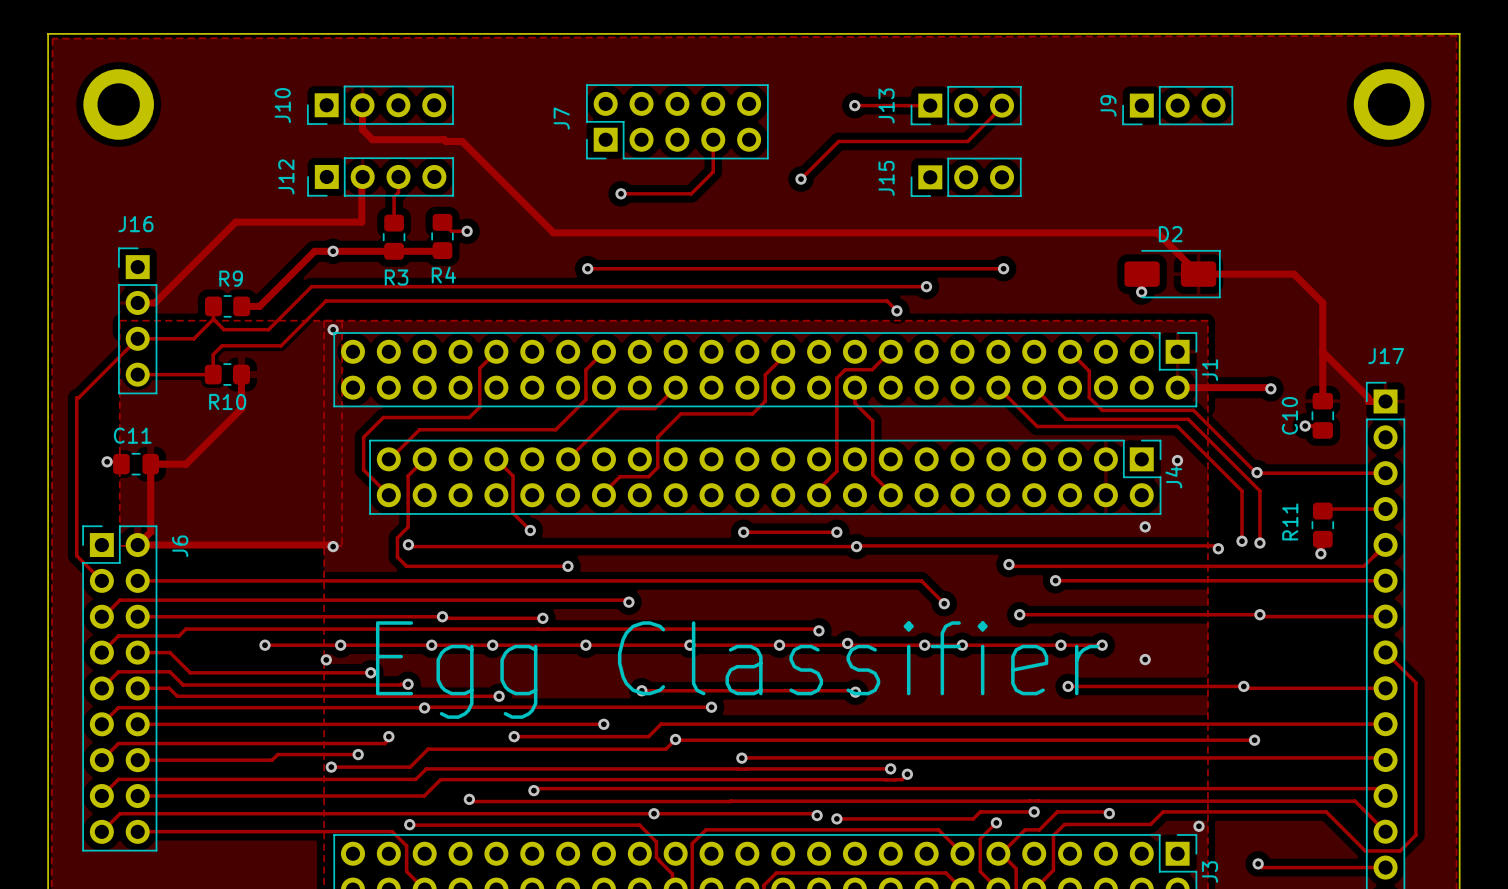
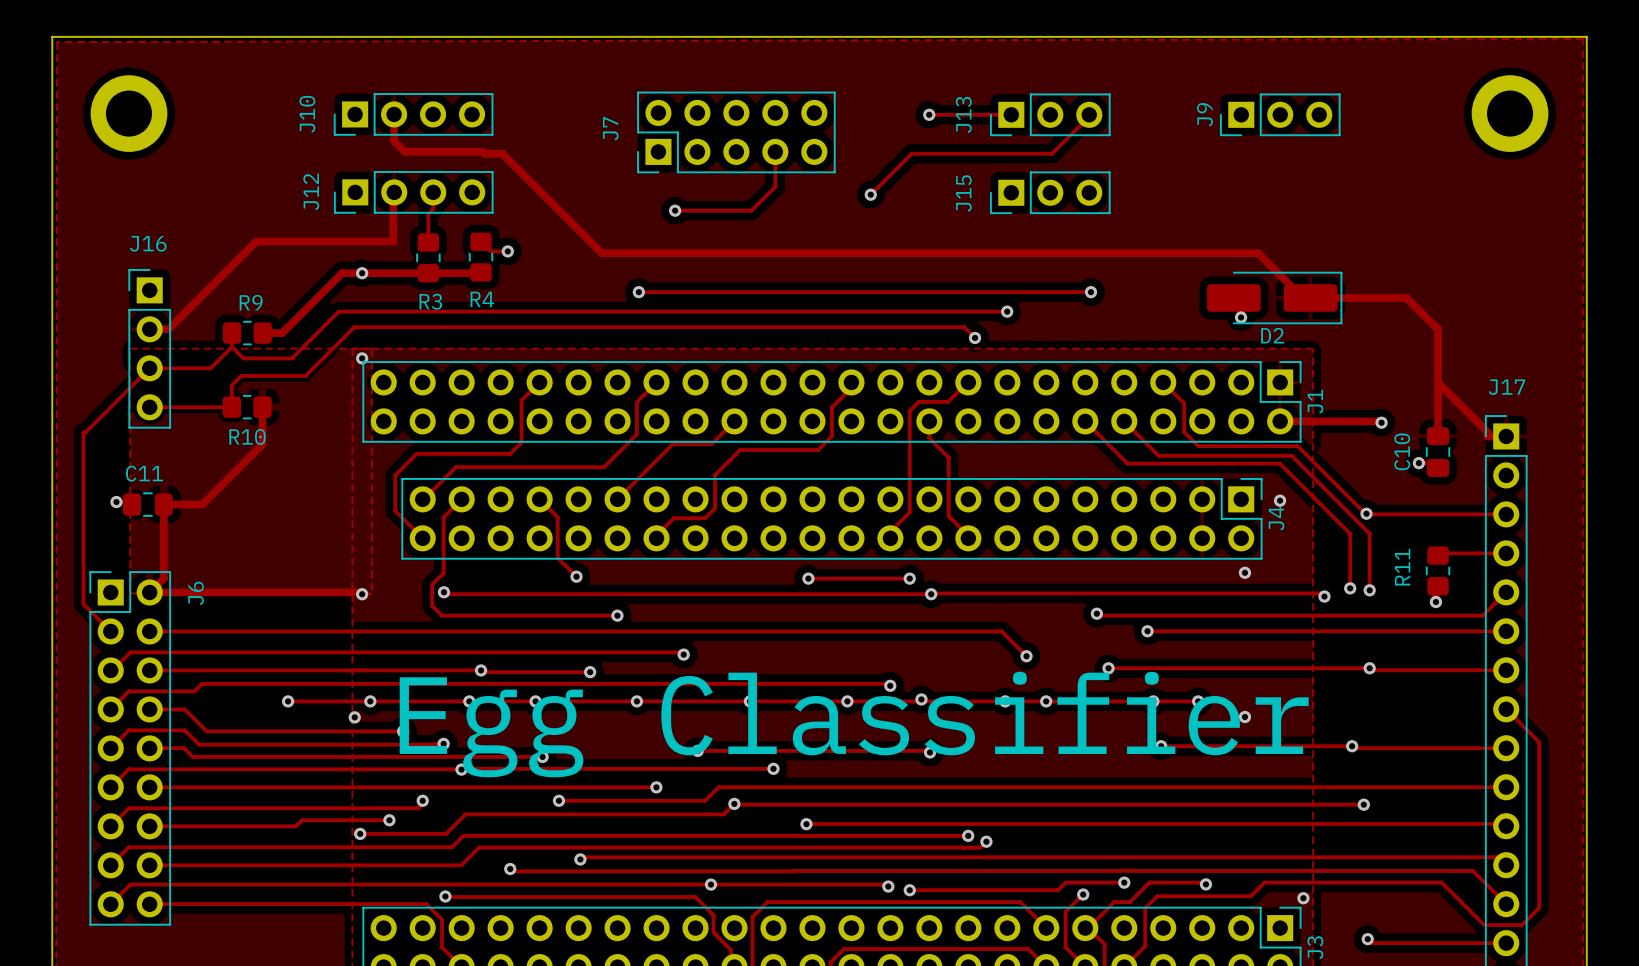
D2 name position: D2 (1170, 234) -> D2 (1272, 335)
D2 footprint: [1124, 249, 1221, 299] -> [1207, 271, 1343, 325]

